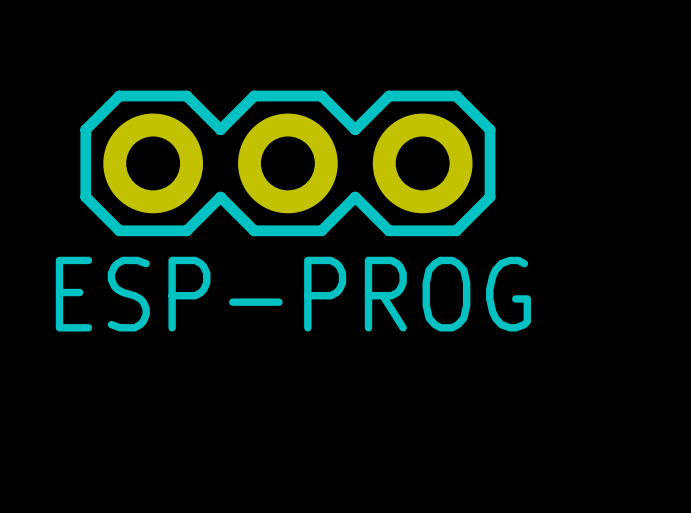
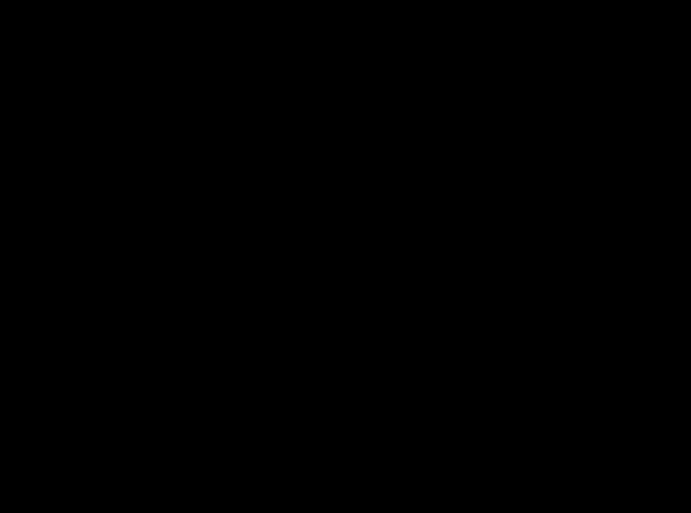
ESP-PROG: (287, 163) -> none

